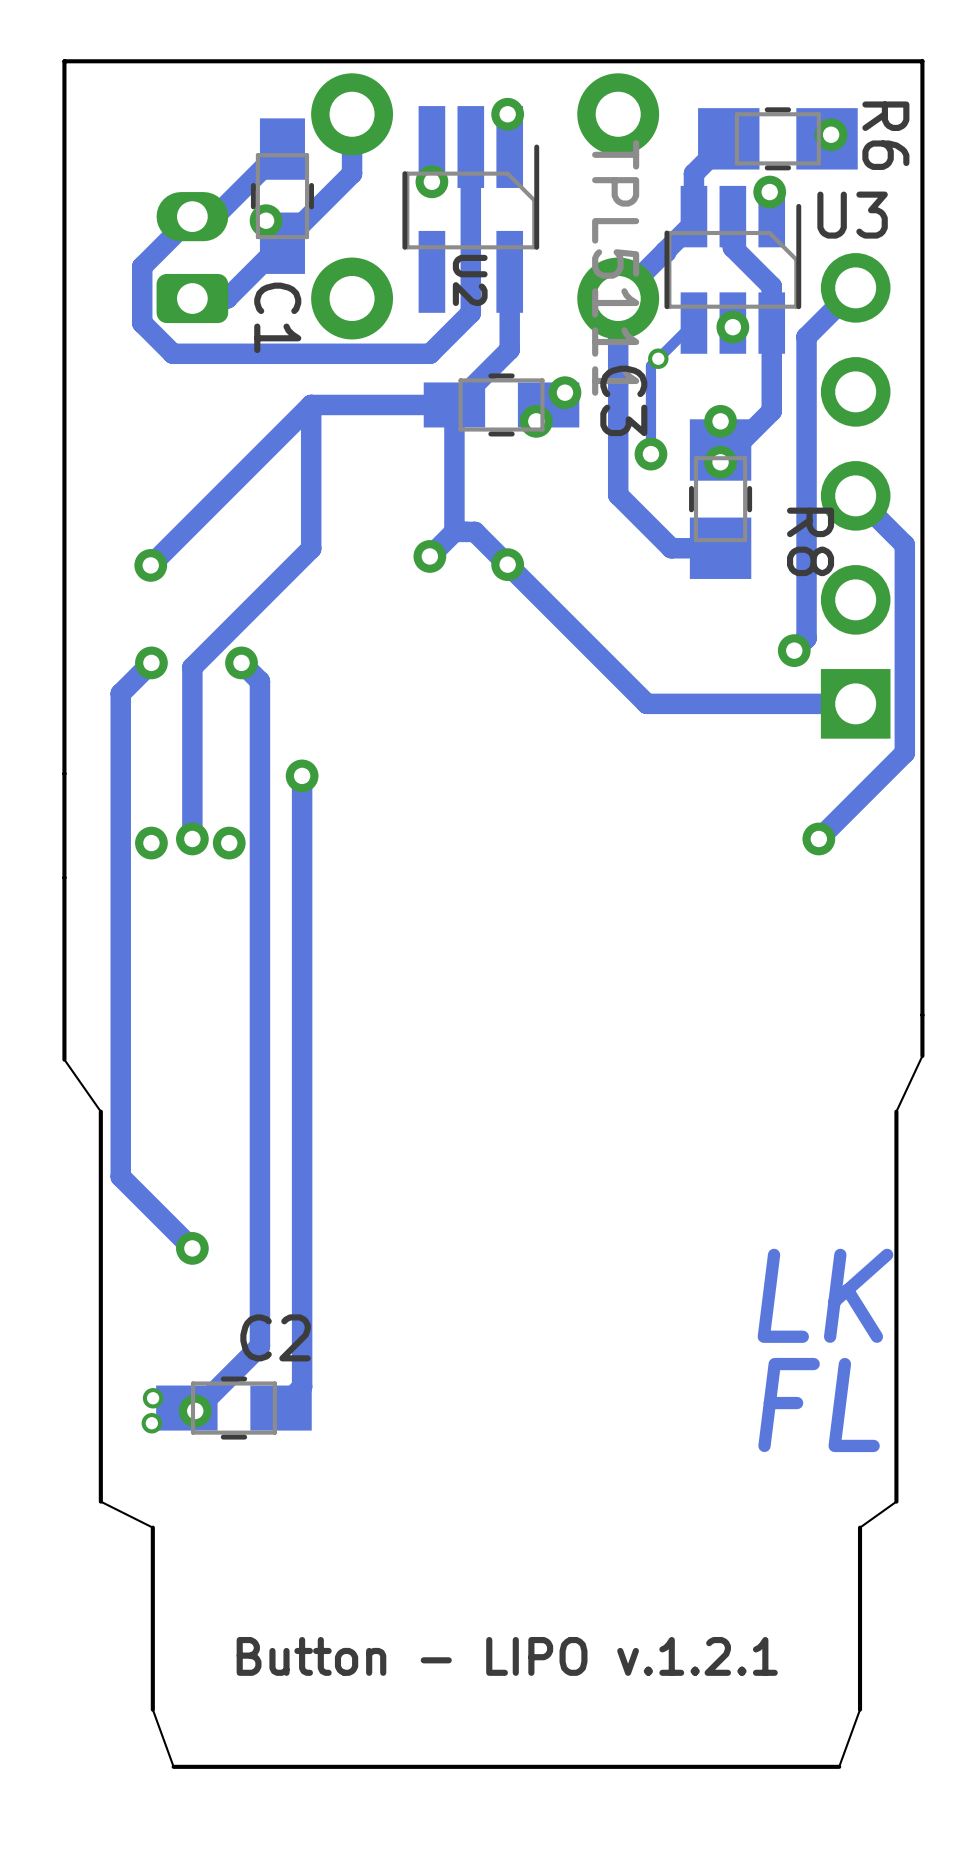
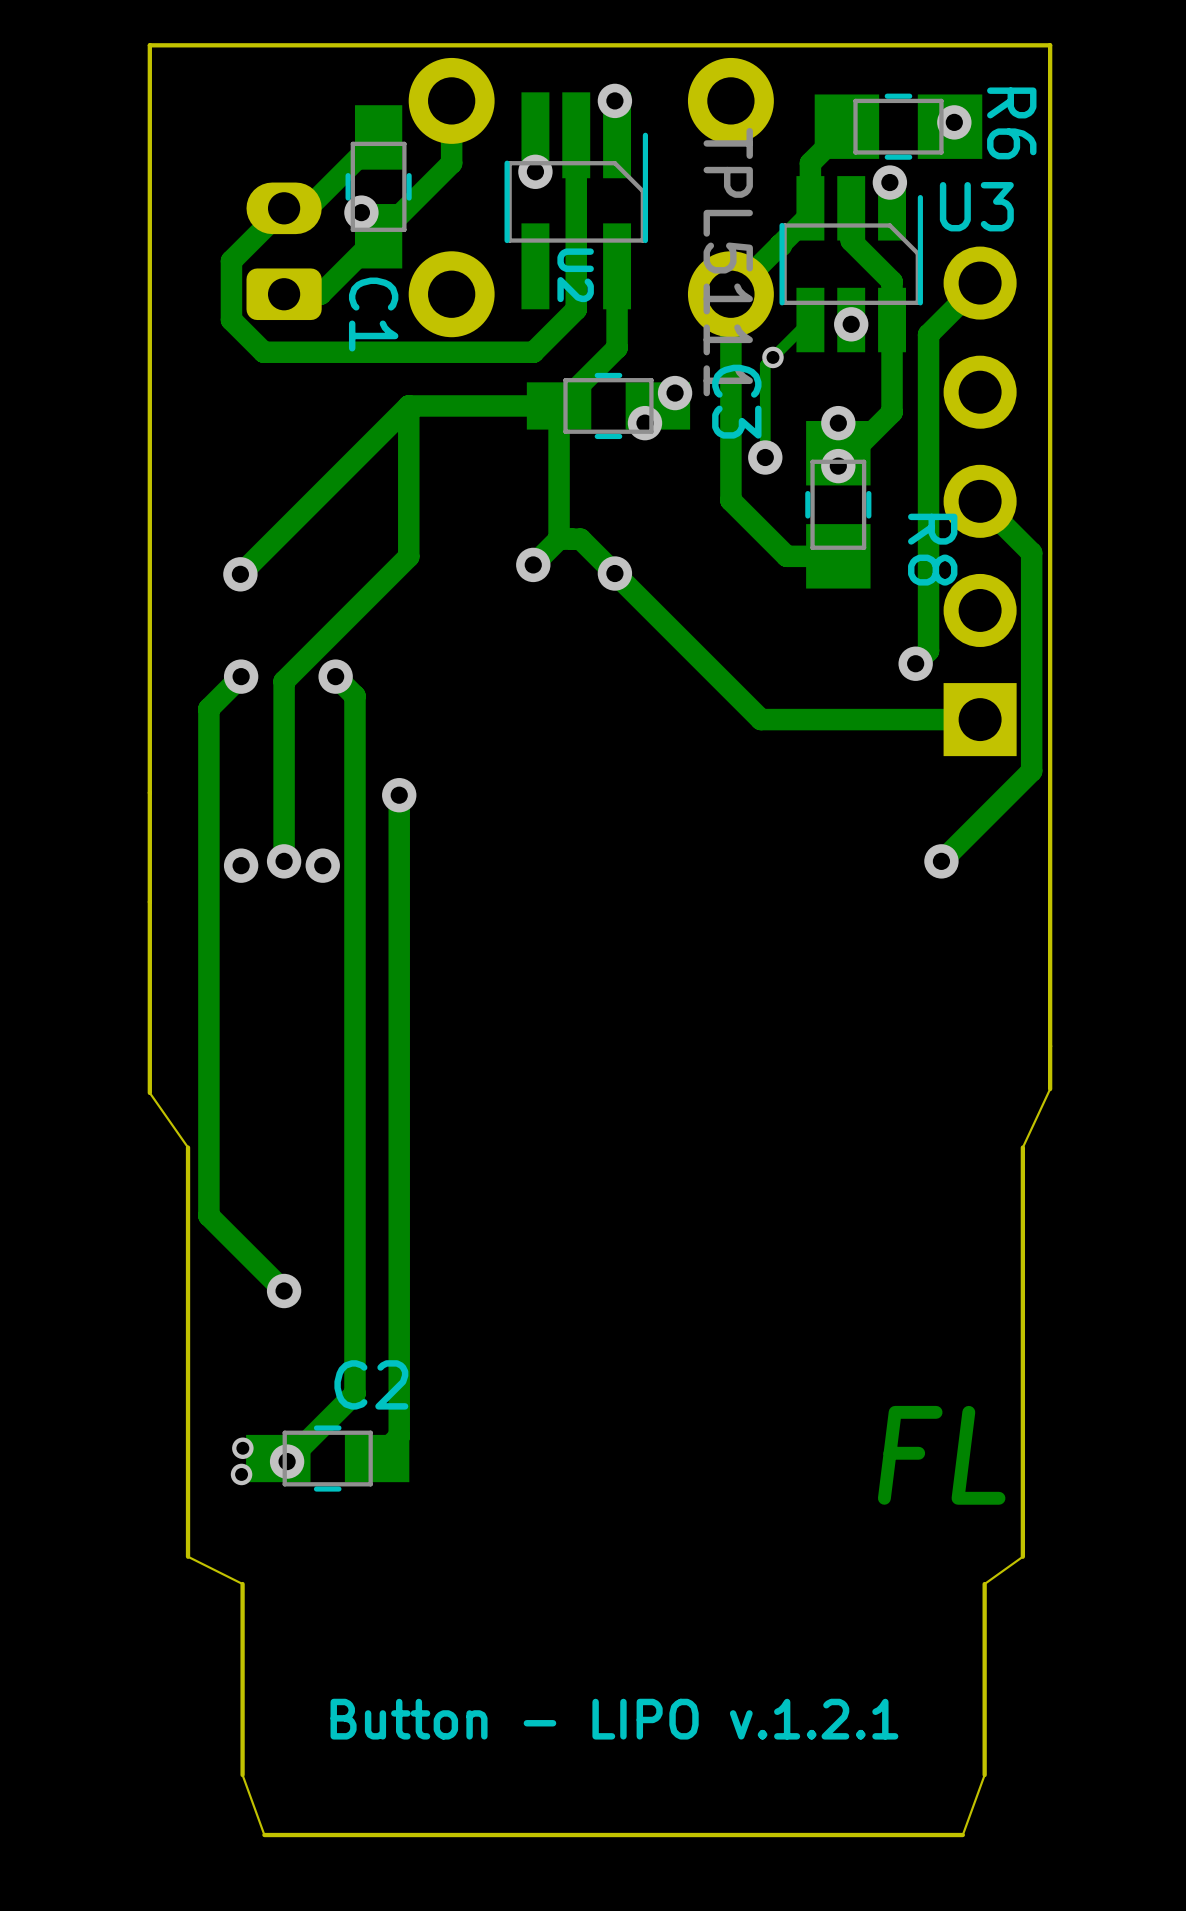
text: LK (825, 1295) -> none

